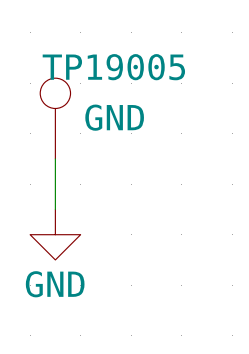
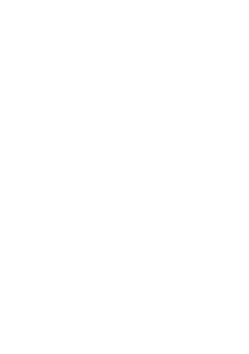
TP19005: GND (55, 118) -> none
wire: (55, 158) (55, 209) -> none
power symbol: GND (55, 234) -> none

